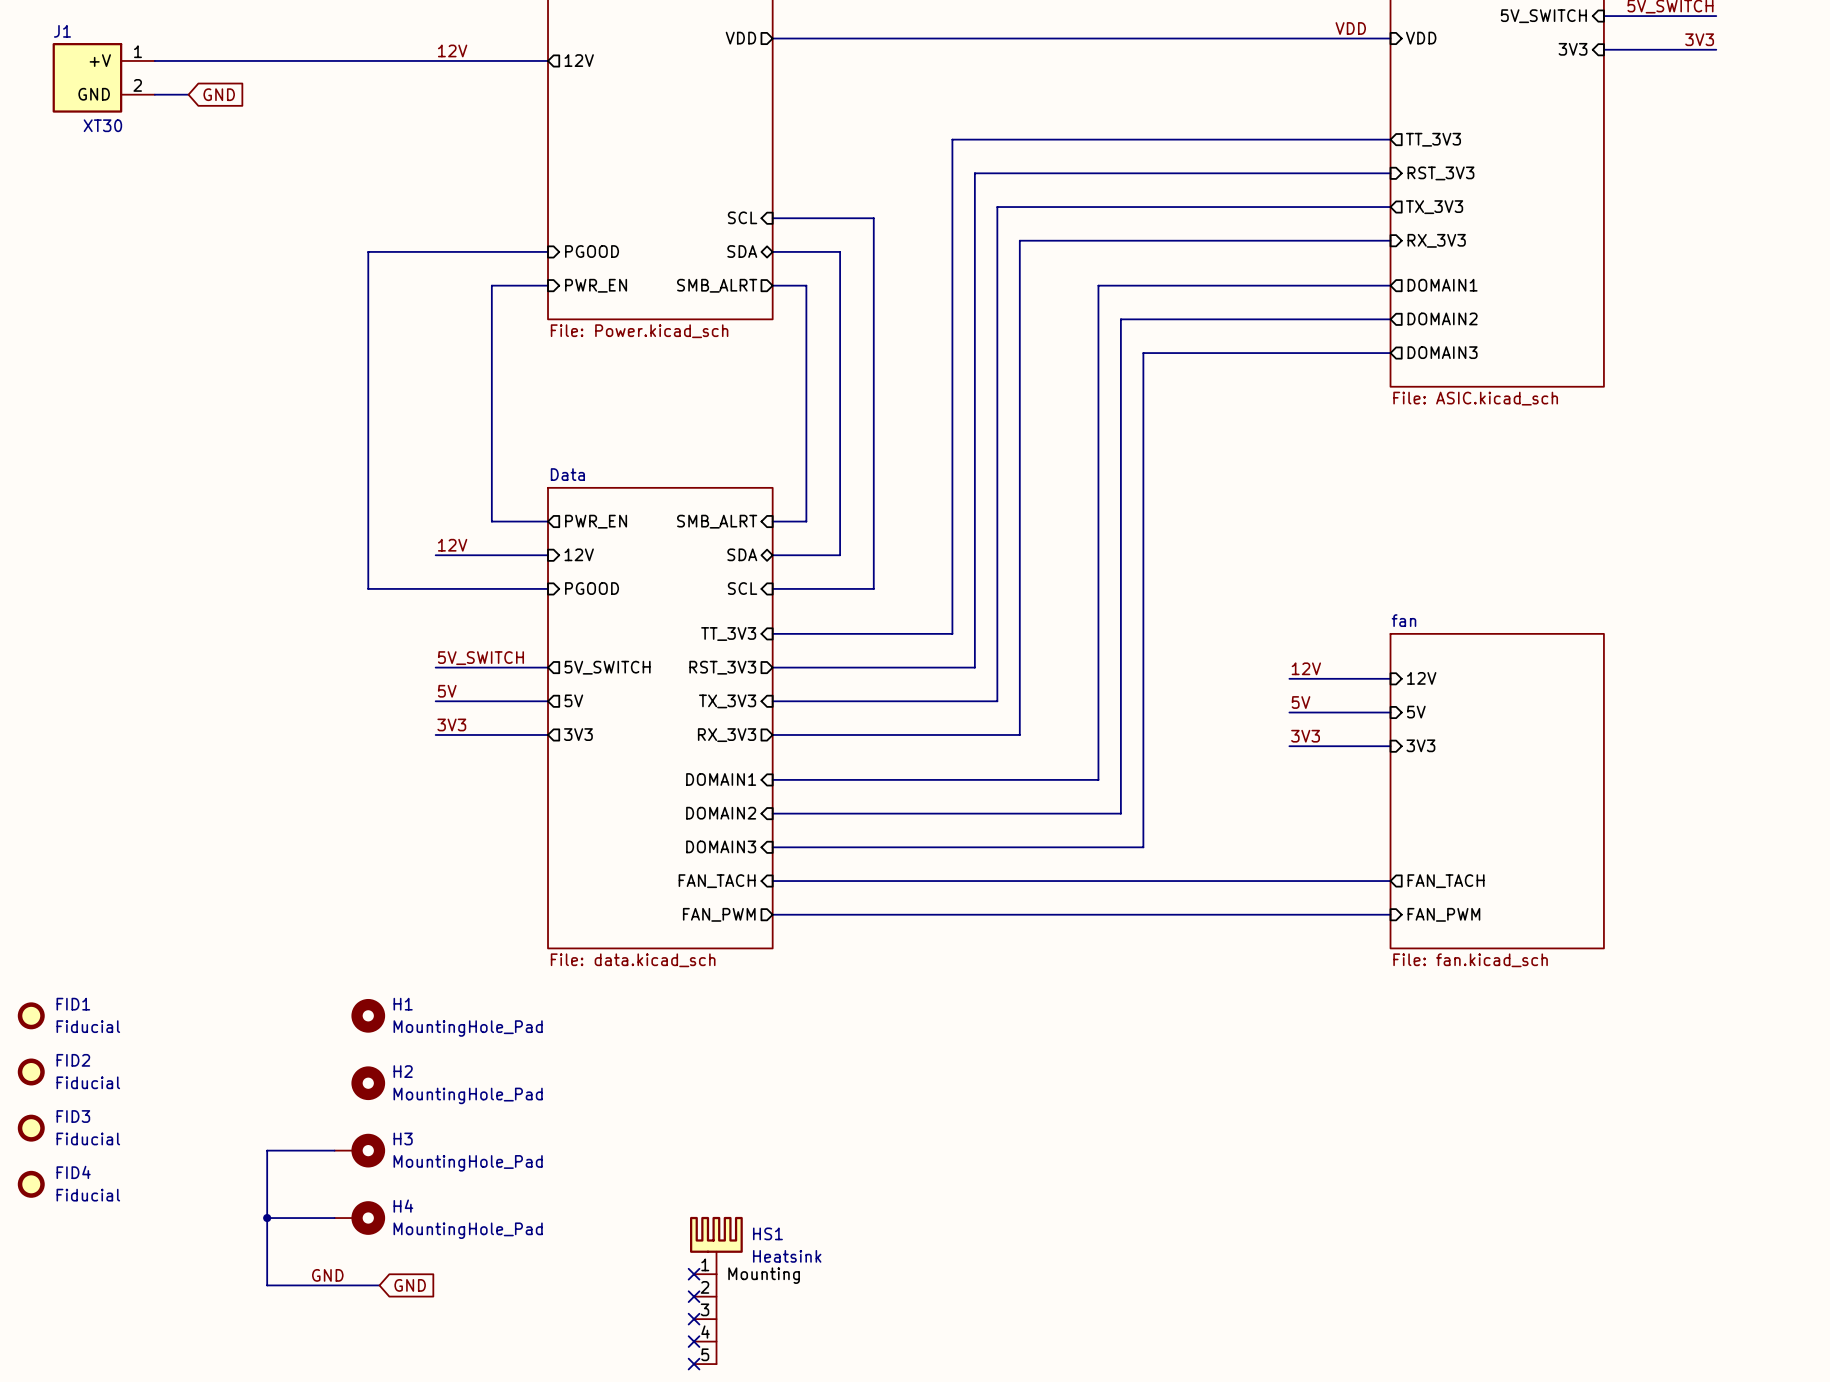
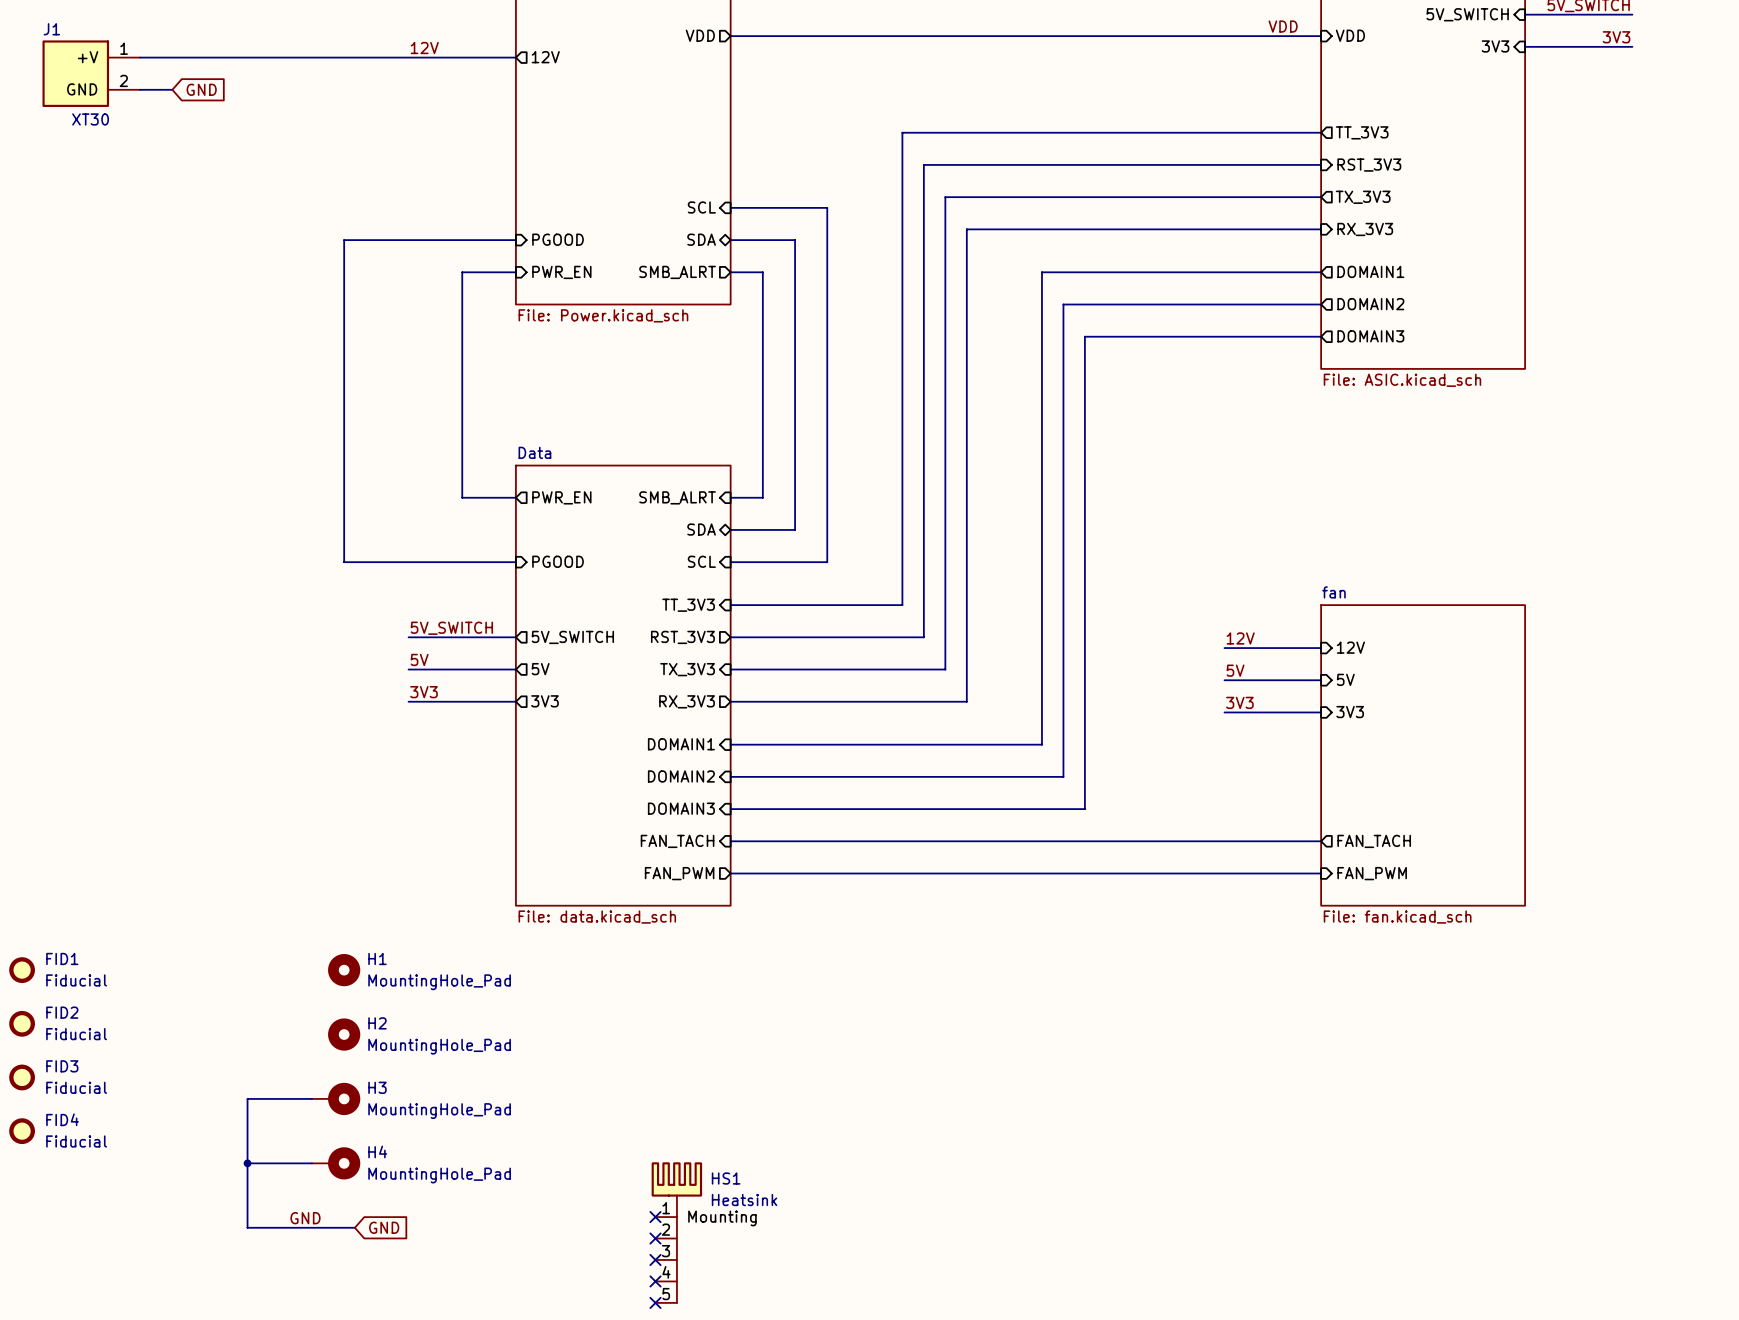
label: 12V (452, 545) -> none
sheet pin: 12V (579, 554) -> none
wire: (435, 555) (548, 555) -> none

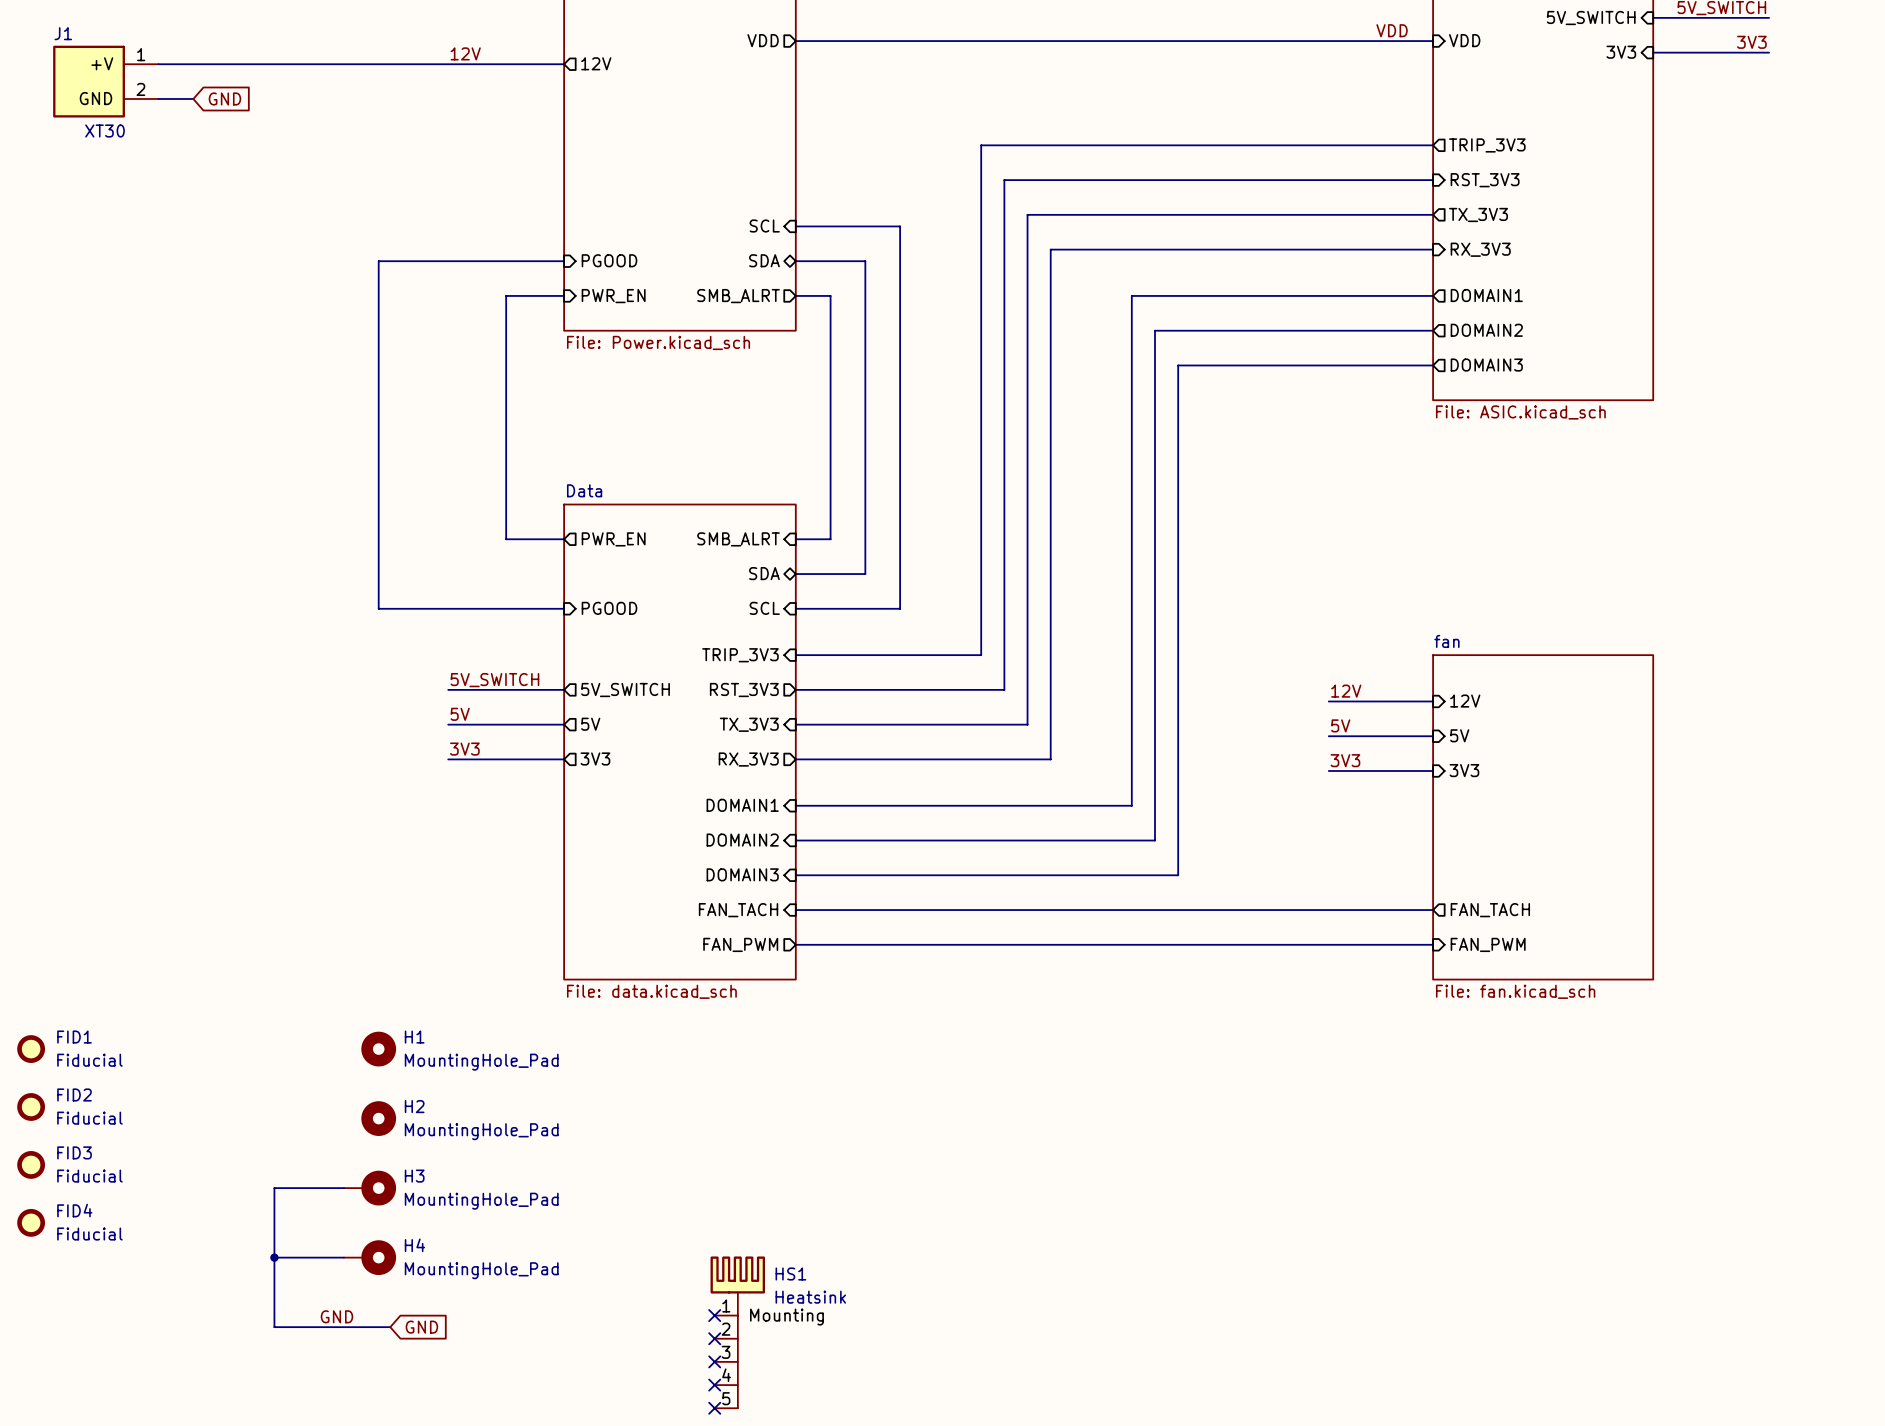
sheet pin: TT_3V3 (1362, 132) -> TRIP_3V3 (1487, 145)
sheet pin: TT_3V3 (688, 605) -> TRIP_3V3 (740, 655)

